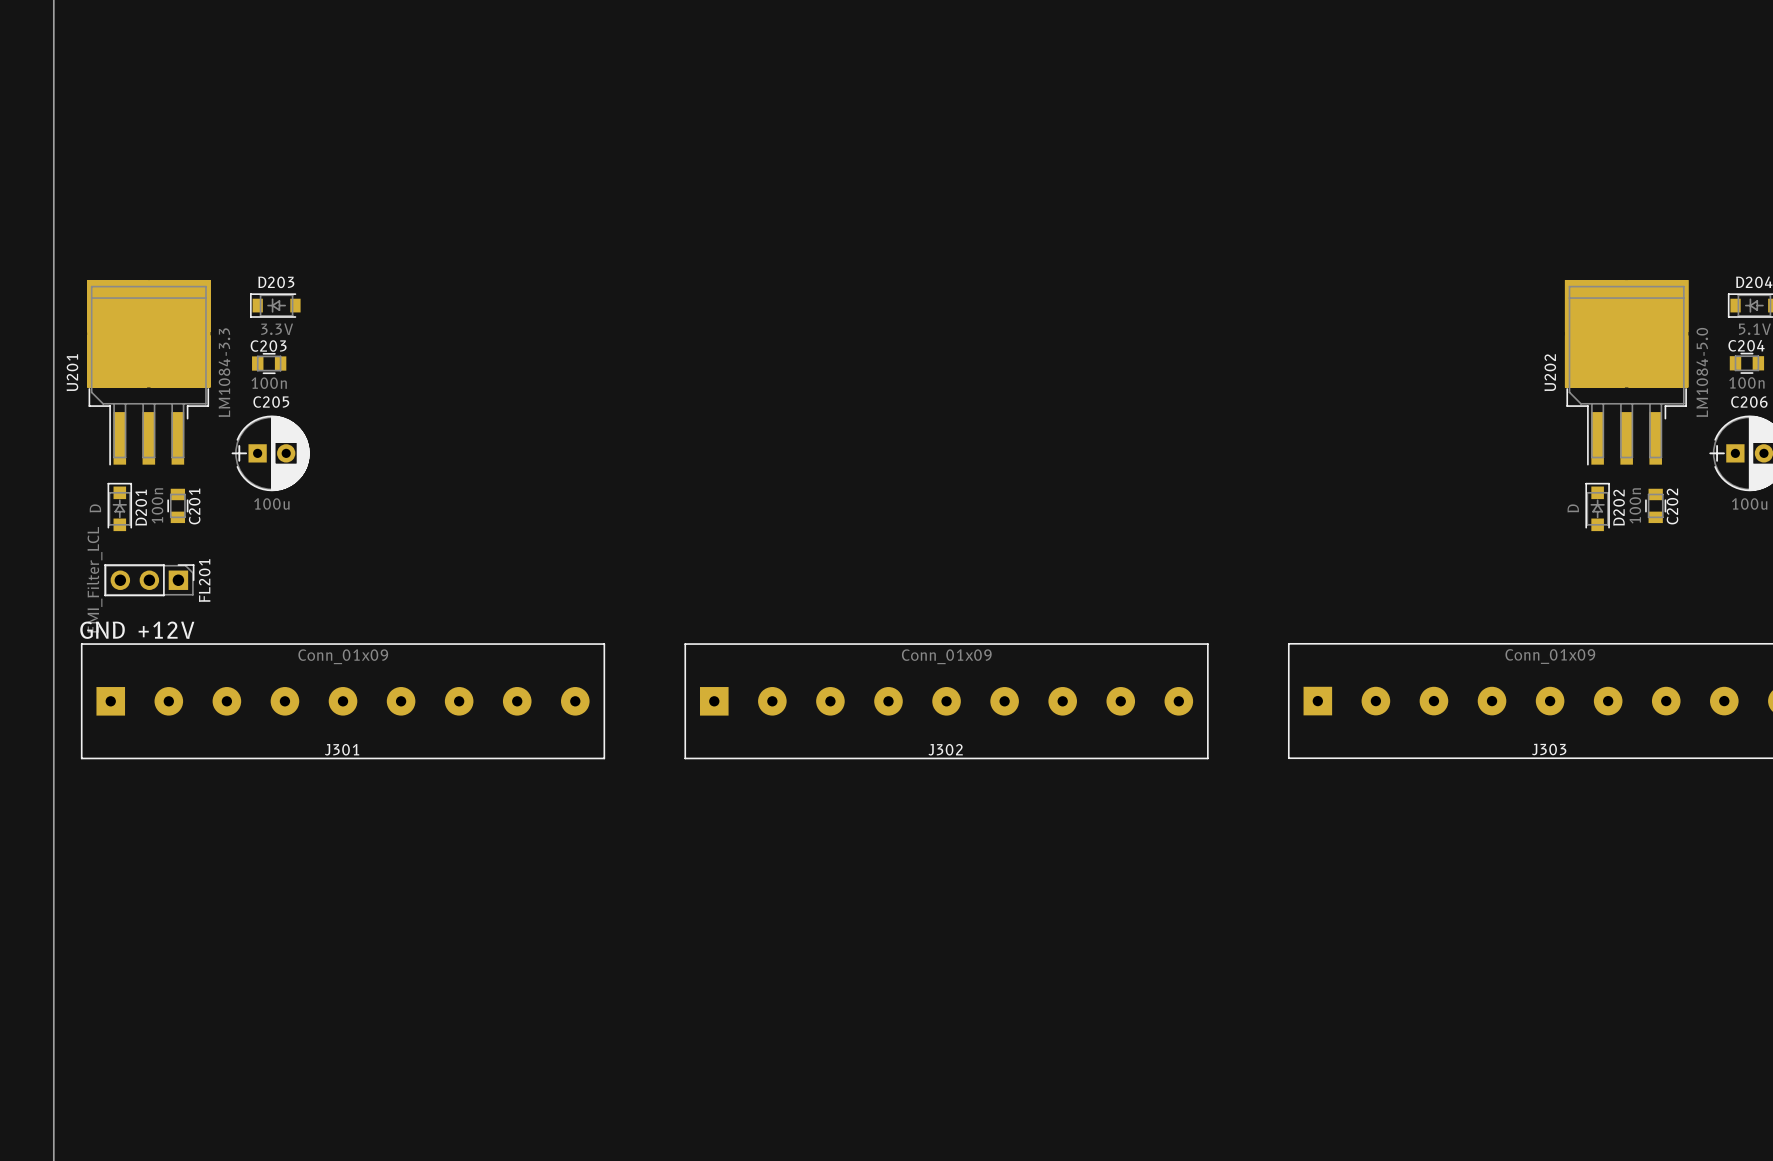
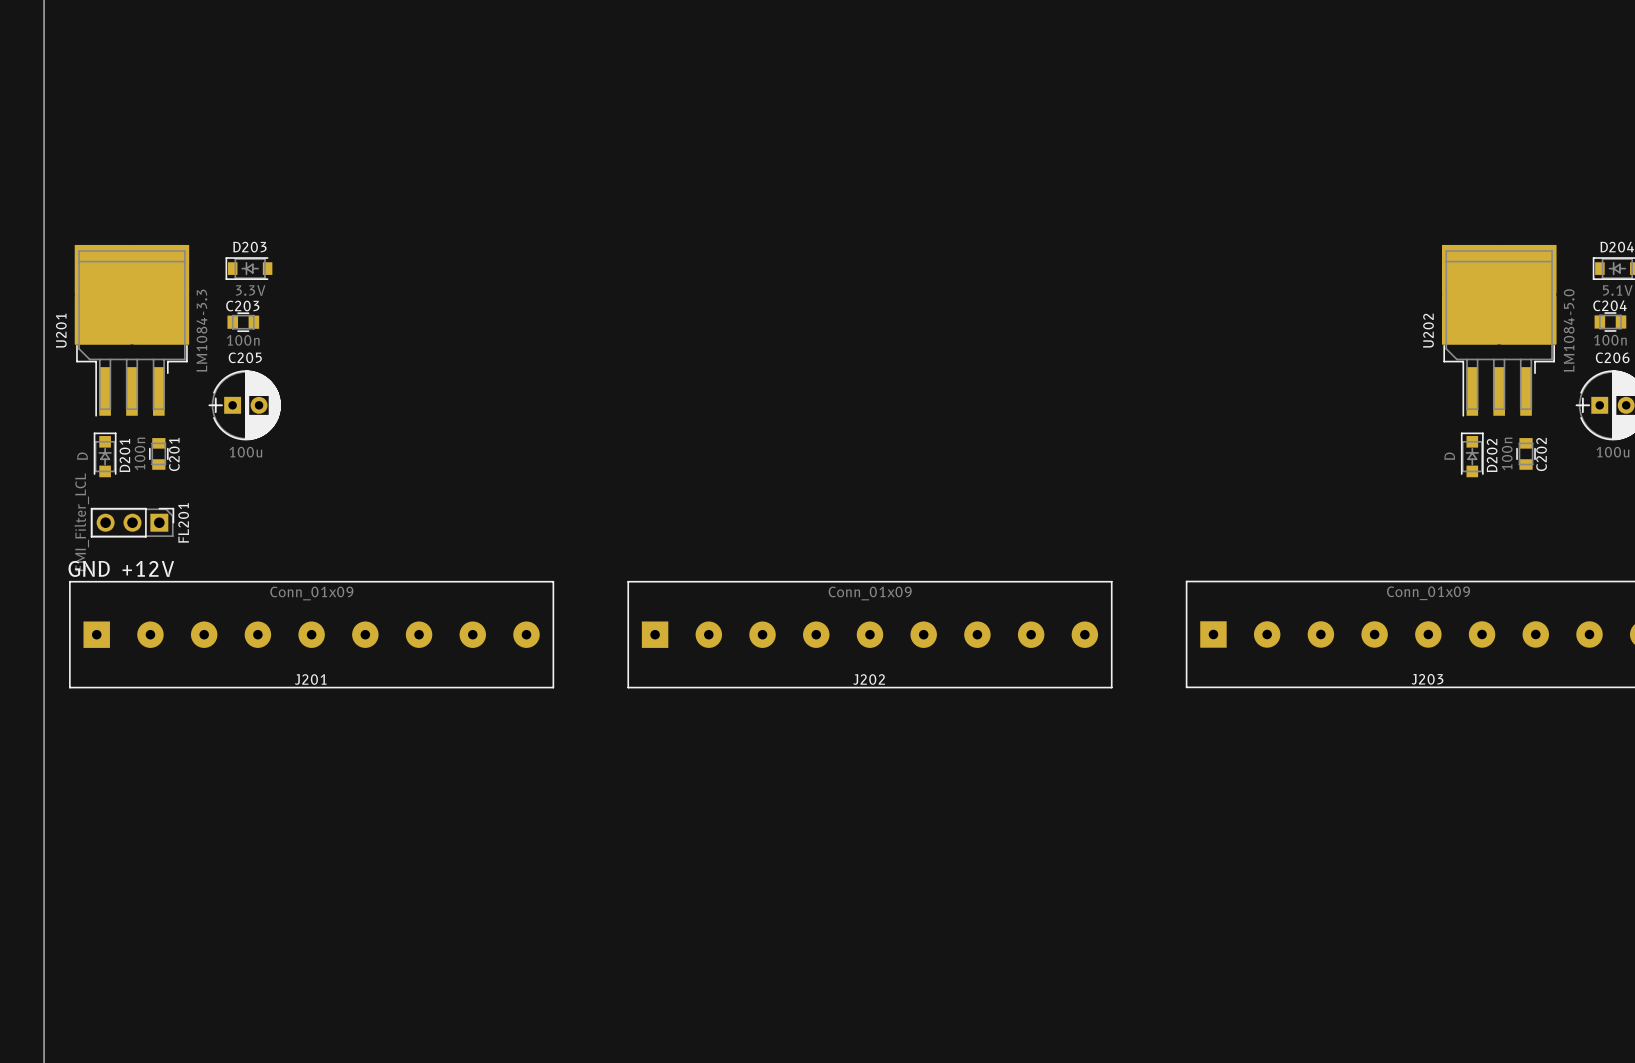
J301 name: J301 (342, 749) -> J201 (310, 679)
J302 name: J302 (945, 749) -> J202 (869, 679)
J303 name: J303 (1549, 749) -> J203 (1427, 679)

